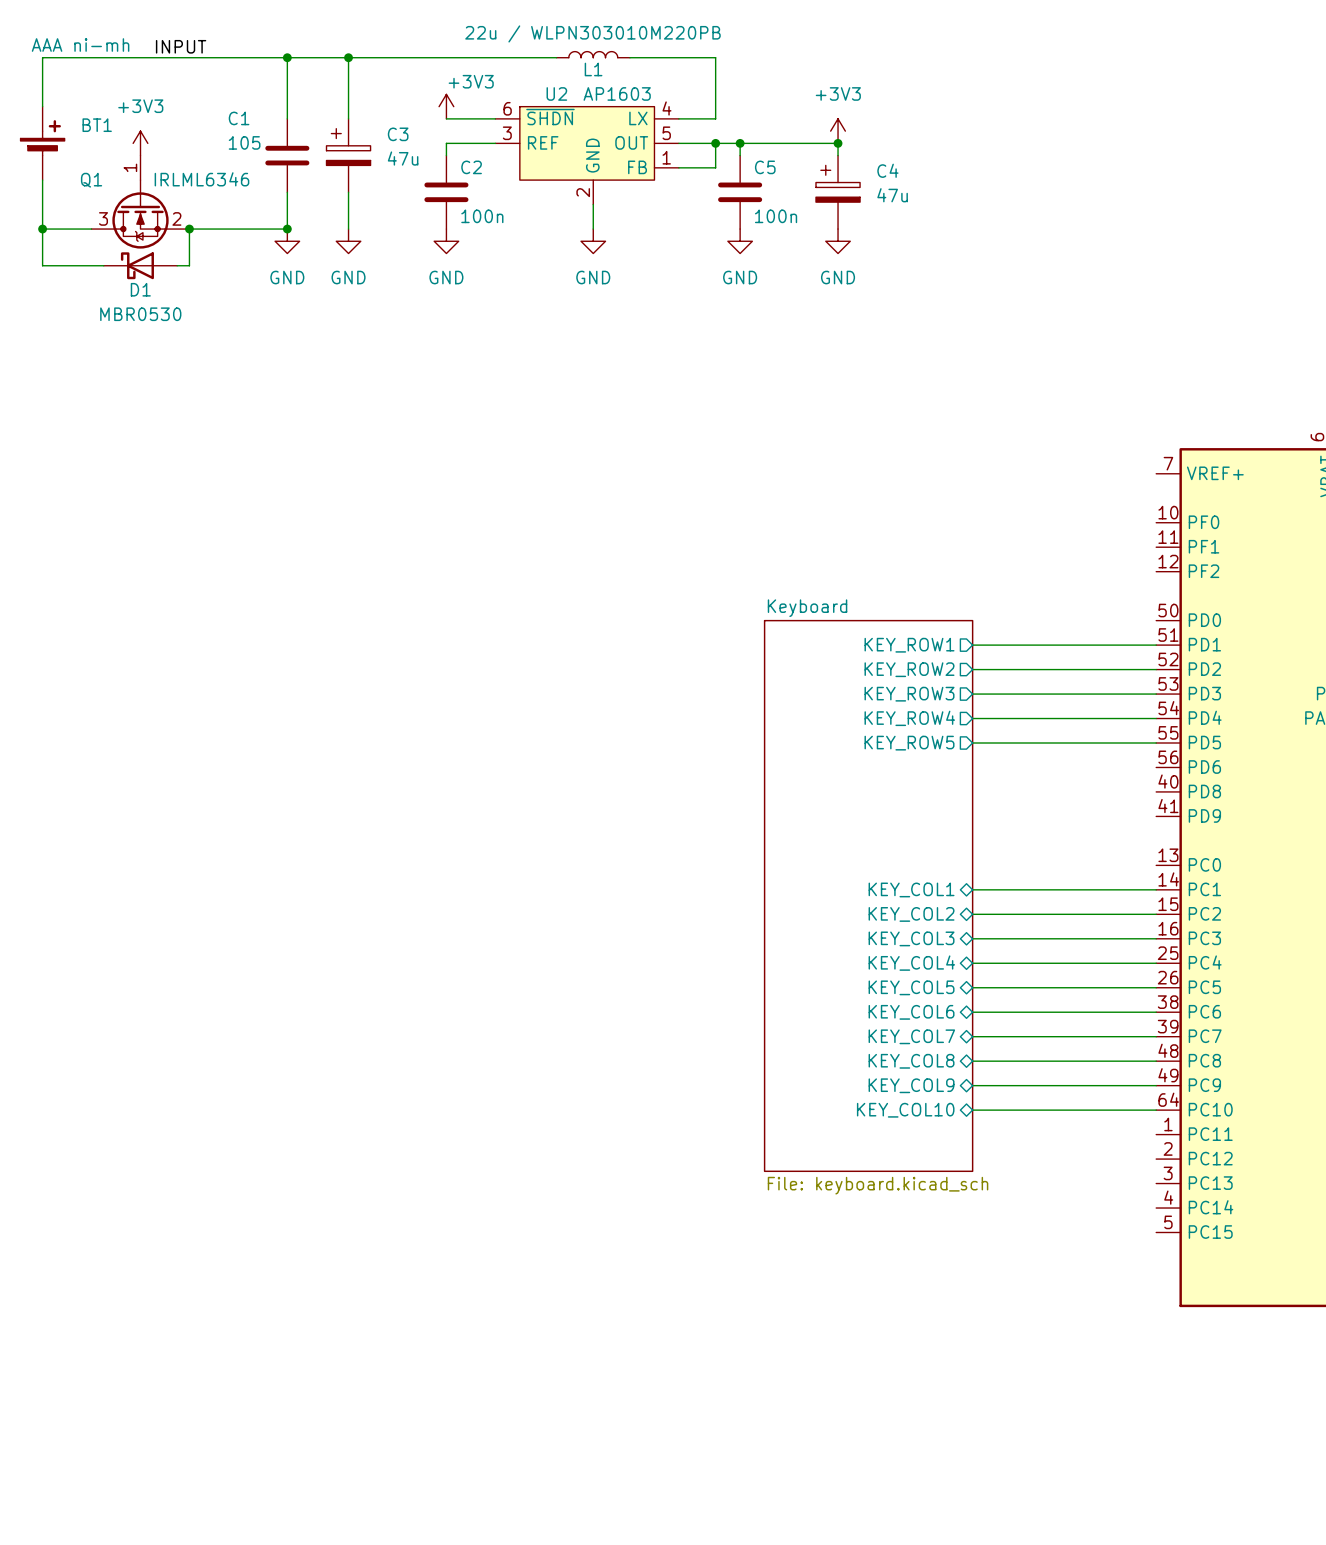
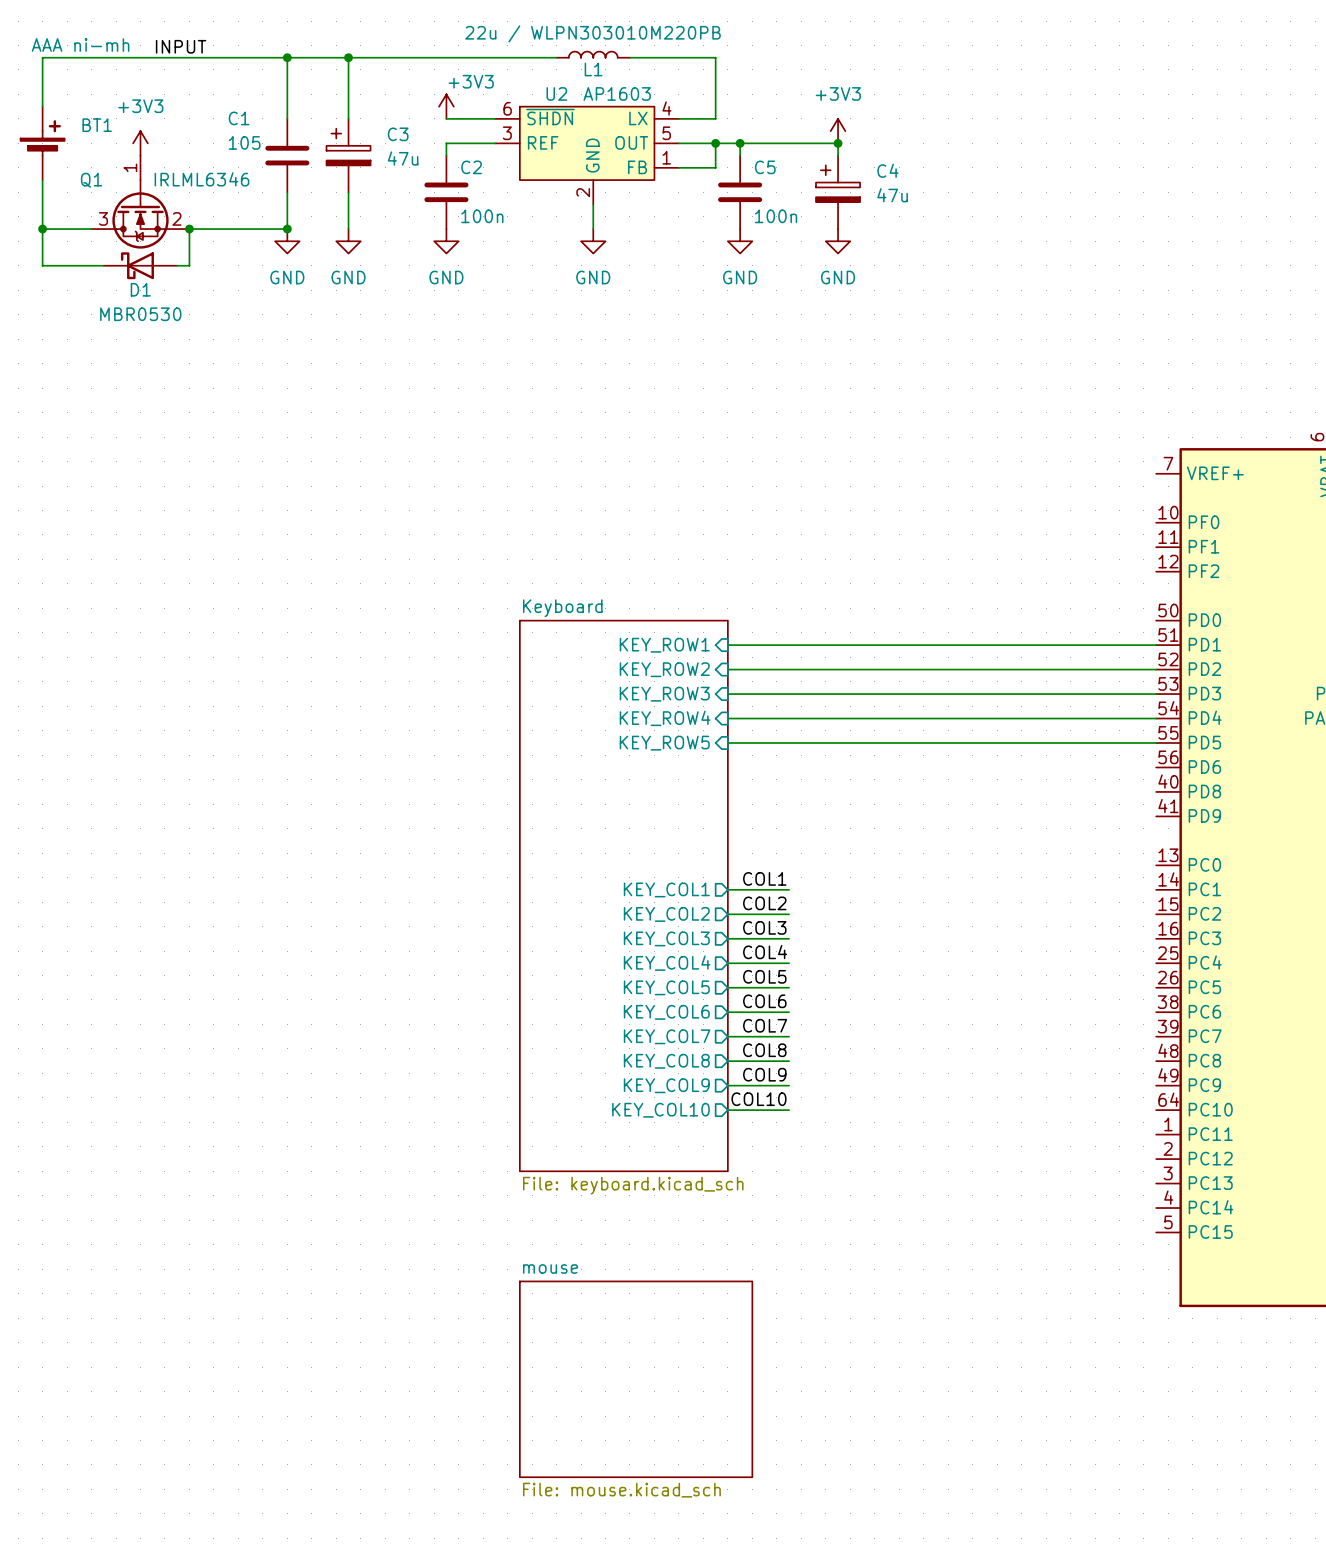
sheet pin: none -> KEY_ROW1 (664, 645)
wire: none -> (727, 645) (972, 645)
sheet pin: KEY_ROW1 (909, 645) -> none
sheet pin: none -> KEY_ROW2 (664, 669)
wire: none -> (727, 669) (972, 669)
sheet pin: KEY_ROW2 (909, 669) -> none
sheet pin: none -> KEY_ROW3 (664, 694)
wire: none -> (727, 694) (972, 694)
sheet pin: KEY_ROW3 (909, 694) -> none
sheet pin: none -> KEY_ROW4 (665, 718)
wire: none -> (727, 718) (972, 718)
sheet pin: KEY_ROW4 (909, 718) -> none
sheet pin: none -> KEY_ROW5 (664, 743)
wire: none -> (727, 743) (972, 743)
sheet pin: KEY_ROW5 (909, 743) -> none
label: none -> COL1 (764, 878)
sheet pin: none -> KEY_COL1 (666, 889)
wire: none -> (727, 889) (789, 889)
sheet pin: KEY_COL1 (911, 889) -> none
wire: (972, 889) (1156, 889) -> none
sheet Keyboard: none -> File: keyboard.kicad_sch (623, 895)
sheet Keyboard: File: keyboard.kicad_sch (868, 895) -> none
label: none -> COL2 (764, 903)
sheet pin: none -> KEY_COL2 (666, 914)
wire: none -> (727, 914) (789, 914)
sheet pin: KEY_COL2 (911, 914) -> none
wire: (972, 914) (1156, 914) -> none
label: none -> COL3 (764, 927)
sheet pin: none -> KEY_COL3 (666, 938)
wire: none -> (727, 938) (789, 938)
sheet pin: KEY_COL3 (911, 938) -> none
wire: (972, 938) (1156, 938) -> none
label: none -> COL4 (765, 952)
sheet pin: none -> KEY_COL4 (667, 963)
wire: none -> (727, 963) (789, 963)
sheet pin: KEY_COL4 (911, 963) -> none
wire: (972, 963) (1156, 963) -> none
label: none -> COL5 (764, 976)
sheet pin: none -> KEY_COL5 (666, 987)
wire: none -> (727, 987) (789, 987)
sheet pin: KEY_COL5 (911, 987) -> none
wire: (972, 987) (1156, 987) -> none
label: none -> COL6 (764, 1001)
sheet pin: none -> KEY_COL6 (666, 1012)
wire: none -> (727, 1012) (789, 1012)
sheet pin: KEY_COL6 (911, 1012) -> none
wire: (972, 1012) (1156, 1012) -> none
label: none -> COL7 (765, 1025)
sheet pin: none -> KEY_COL7 (667, 1036)
wire: none -> (727, 1036) (789, 1036)
sheet pin: KEY_COL7 (911, 1036) -> none
wire: (972, 1036) (1156, 1036) -> none
label: none -> COL8 (764, 1050)
sheet pin: none -> KEY_COL8 (666, 1061)
wire: none -> (727, 1061) (789, 1061)
sheet pin: KEY_COL8 (911, 1061) -> none
wire: (972, 1061) (1156, 1061) -> none
label: none -> COL9 (764, 1074)
sheet pin: none -> KEY_COL9 (666, 1085)
wire: none -> (727, 1085) (789, 1085)
sheet pin: KEY_COL9 (911, 1085) -> none
wire: (972, 1085) (1156, 1085) -> none
label: none -> COL10 (758, 1099)
sheet pin: none -> KEY_COL10 (660, 1110)
wire: none -> (727, 1110) (789, 1110)
sheet pin: KEY_COL10 (905, 1110) -> none
wire: (972, 1110) (1156, 1110) -> none
sheet mouse: none -> File: mouse.kicad_sch (636, 1379)

